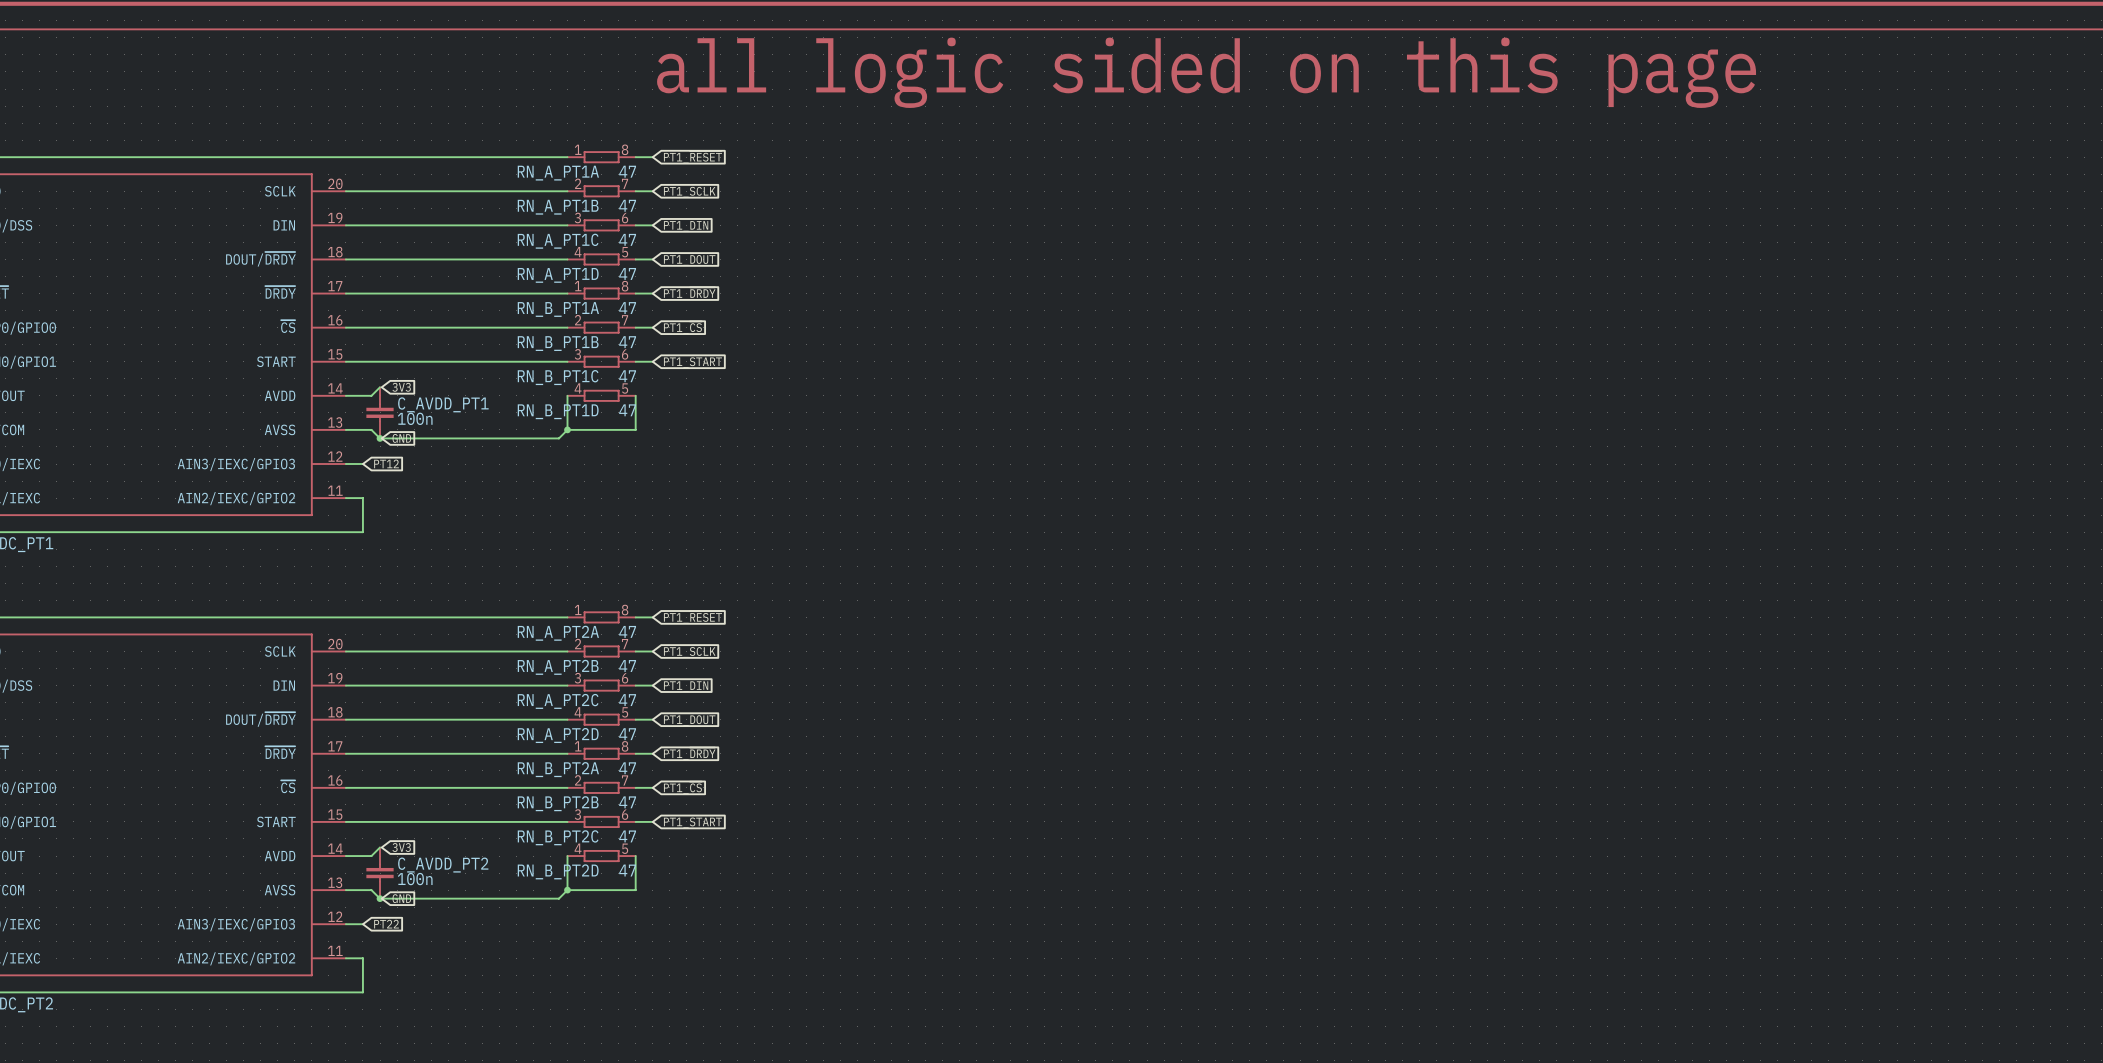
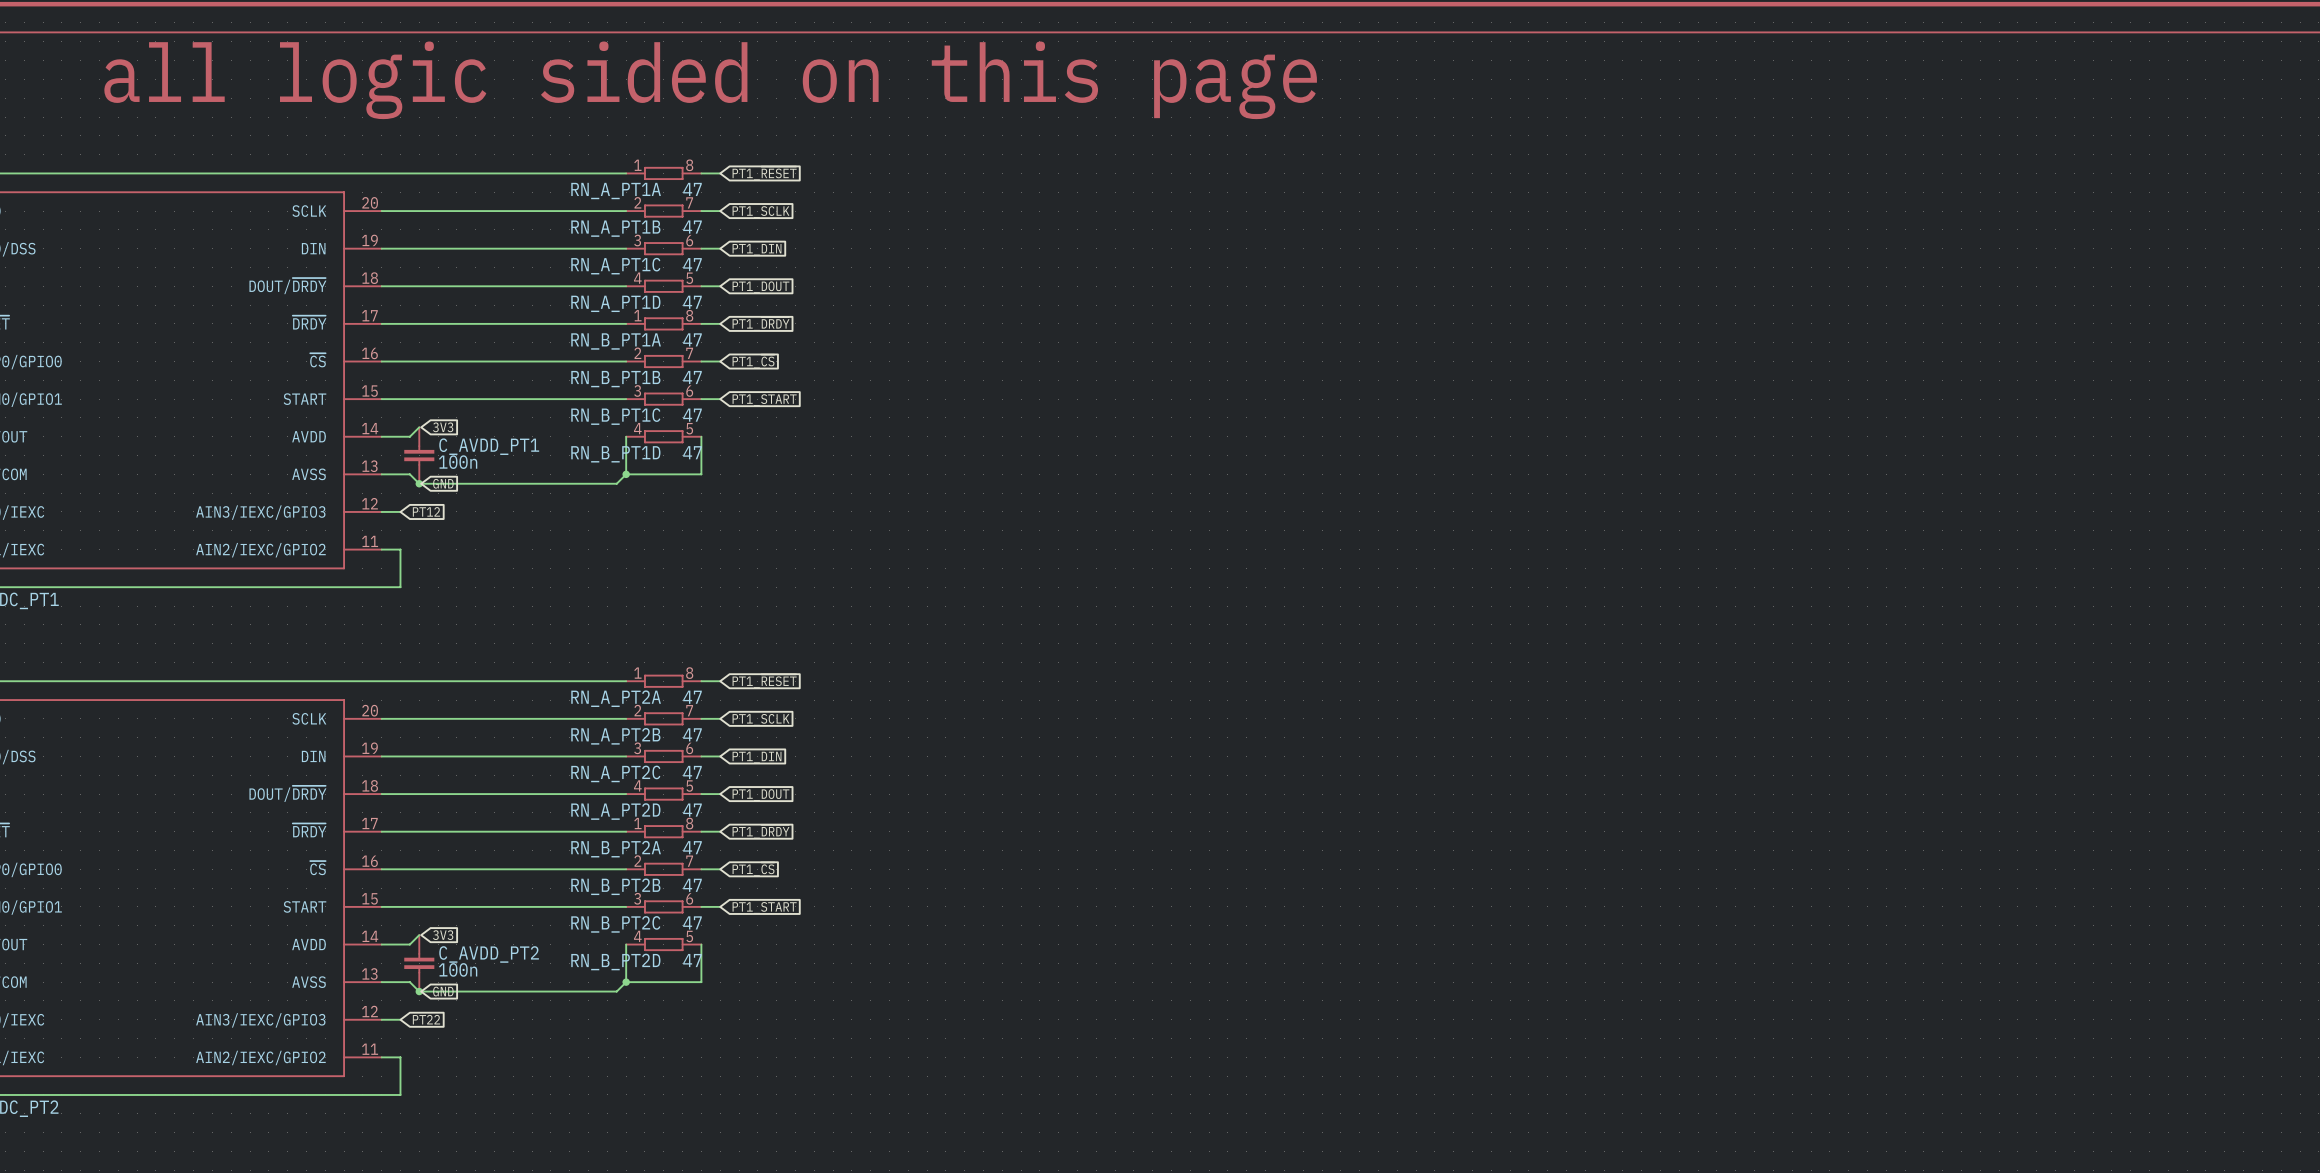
text: none -> all logic sided on this page (710, 80)
text: all logic sided on this page (1206, 72) -> none

